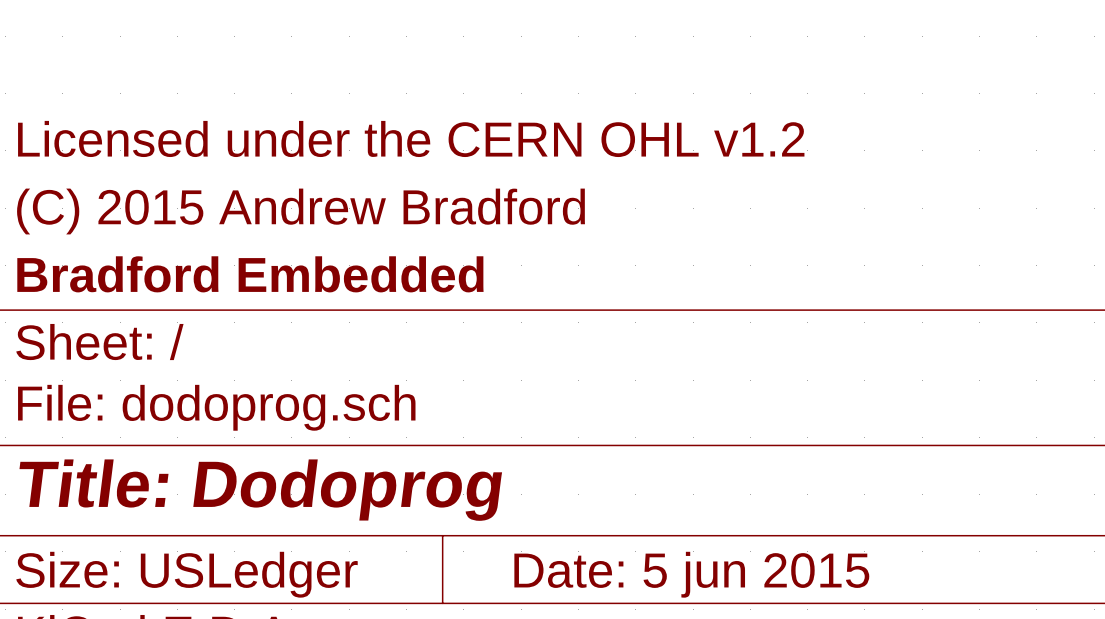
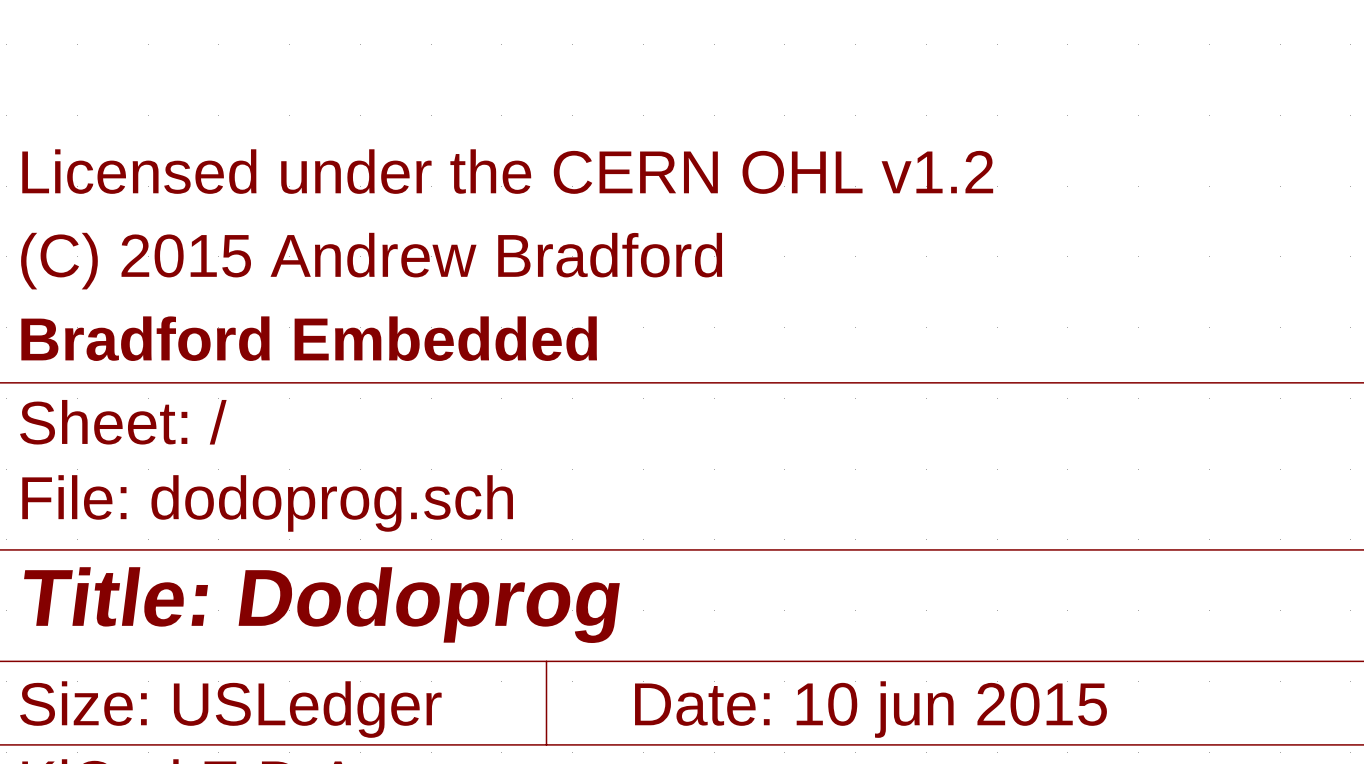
title block: Date: 5 jun 2015 (691, 574) -> Date: 10 jun 2015 (870, 709)

